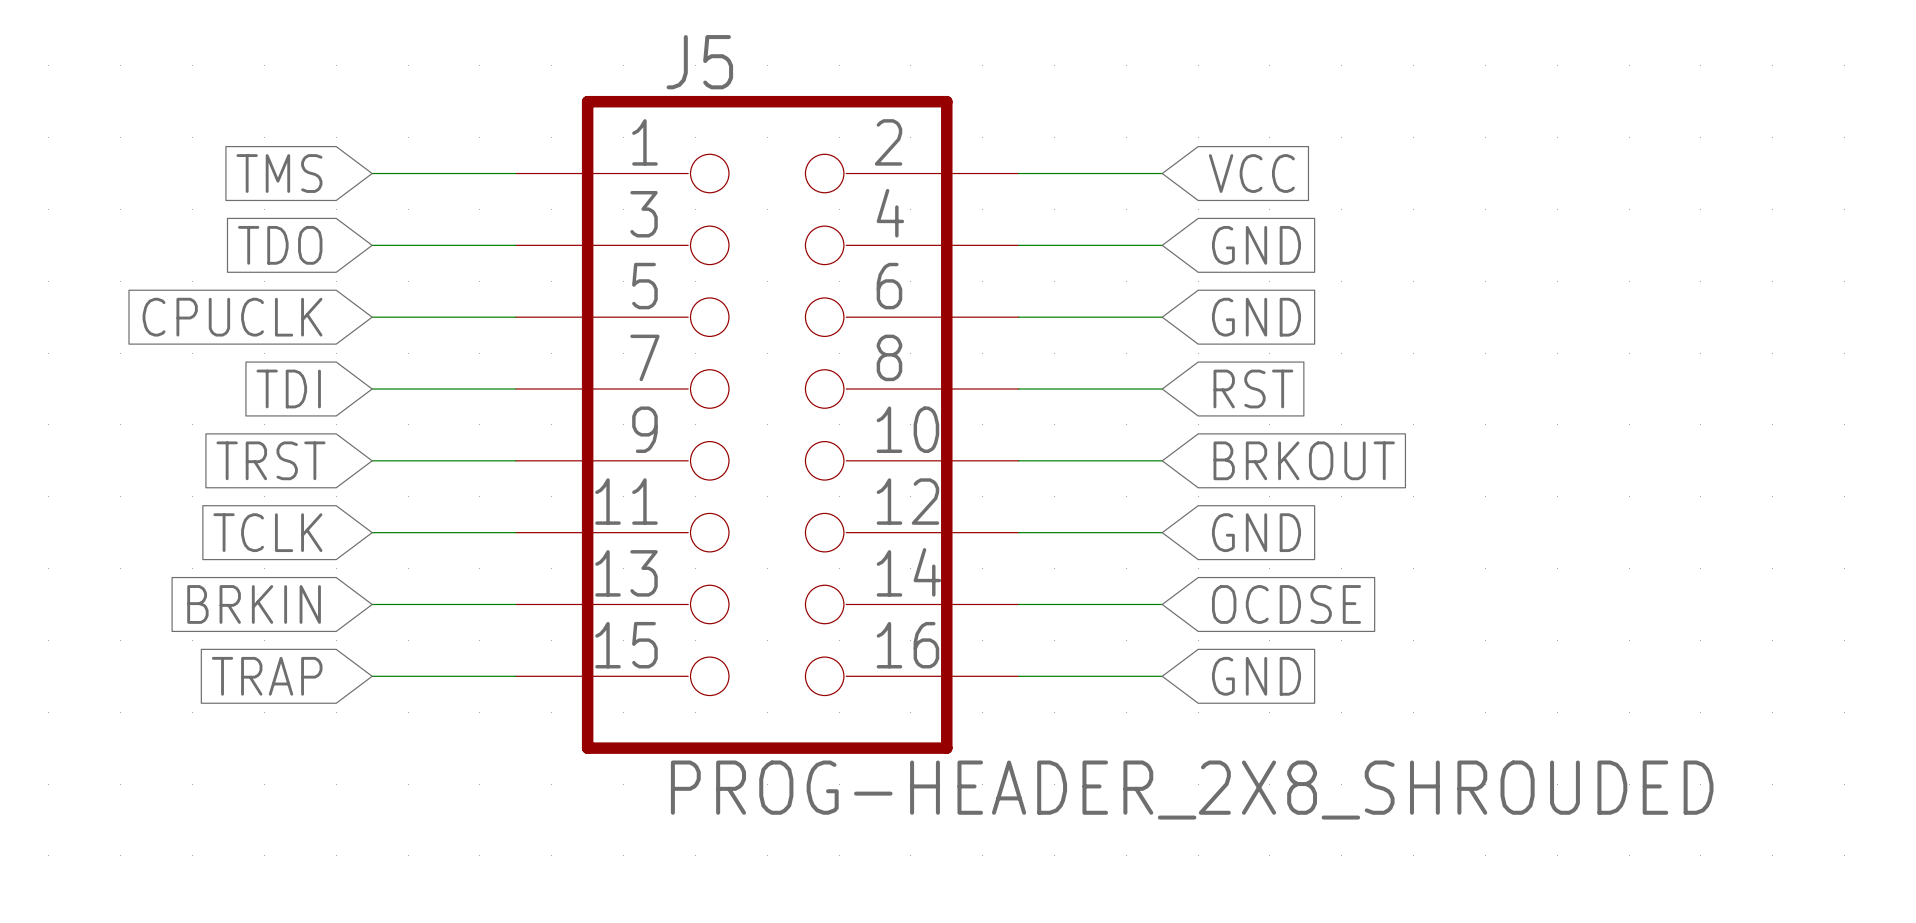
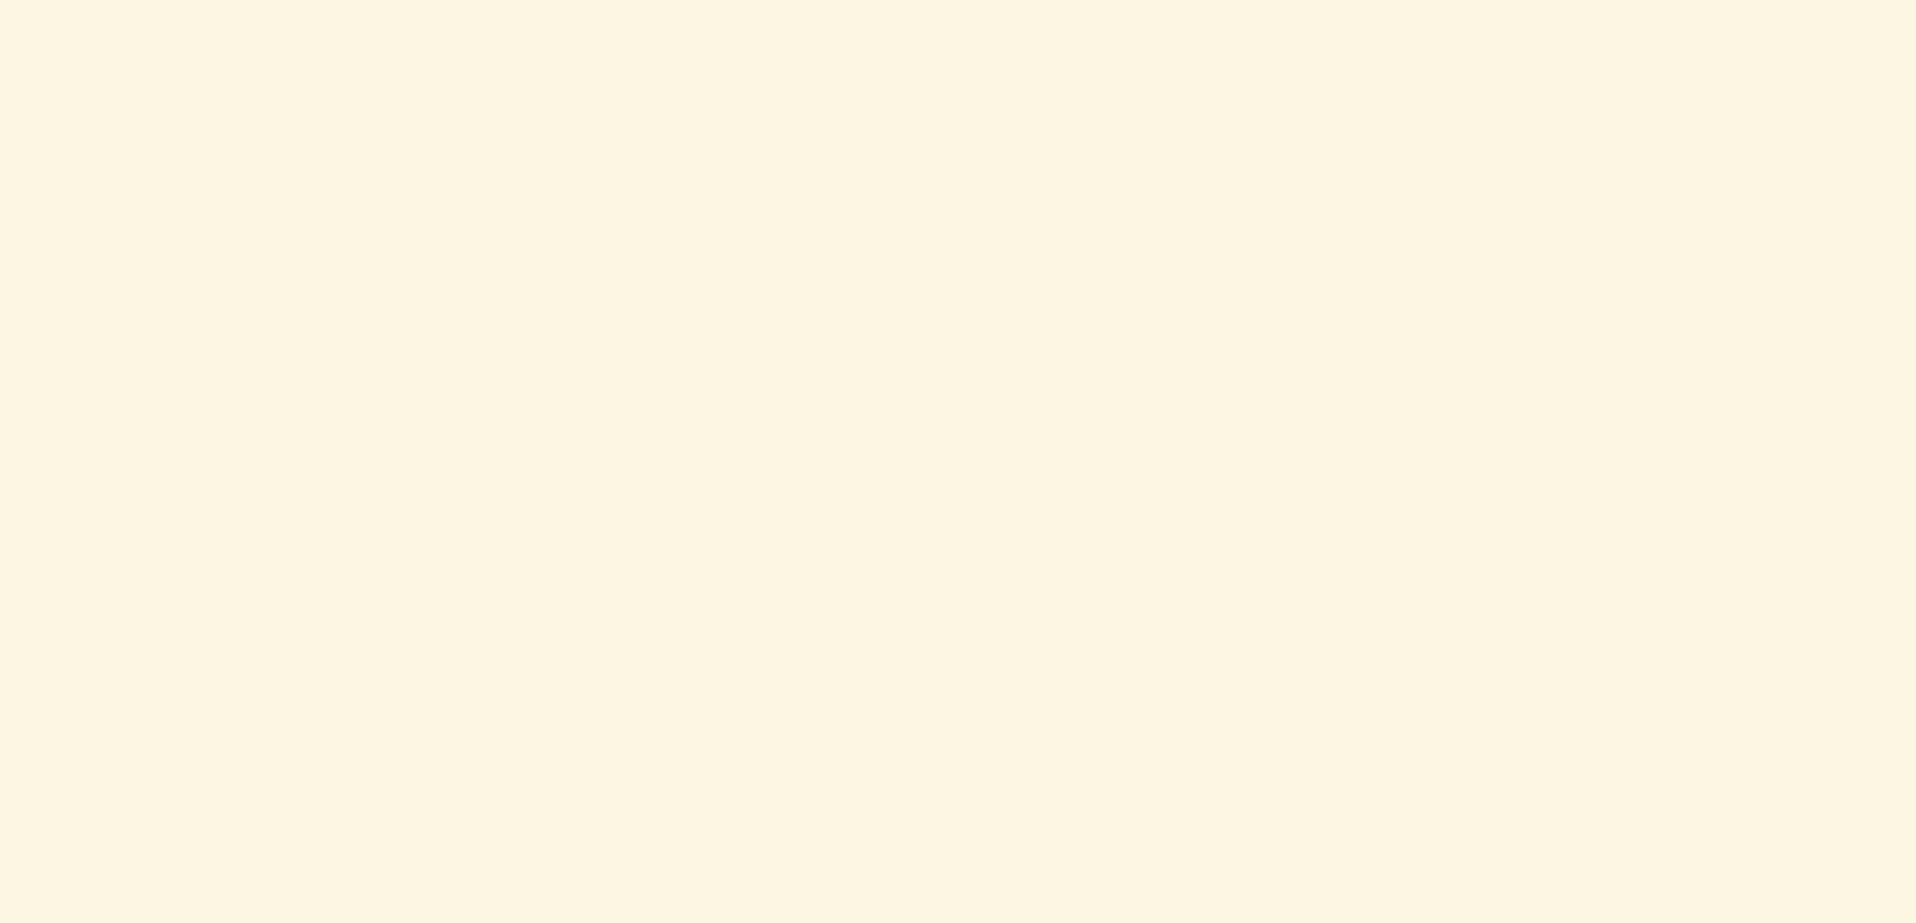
global label: TMS (279, 173) -> none
wire: (372, 173) (515, 173) -> none
wire: (1018, 173) (1162, 173) -> none
global label: VCC (1251, 173) -> none
global label: TDO (280, 245) -> none
wire: (372, 245) (515, 245) -> none
wire: (1018, 245) (1162, 245) -> none
global label: GND (1256, 245) -> none
global label: CPUCLK (232, 317) -> none
wire: (372, 317) (515, 317) -> none
wire: (1018, 317) (1162, 317) -> none
global label: GND (1256, 317) -> none
global label: TDI (288, 389) -> none
wire: (372, 389) (515, 389) -> none
wire: (1018, 389) (1162, 389) -> none
global label: RST (1253, 389) -> none
J5: PROG-HEADER_2X8_SHROUDED (767, 424) -> none
global label: TRST (271, 460) -> none
wire: (372, 460) (515, 460) -> none
wire: (1018, 460) (1162, 460) -> none
global label: BRKOUT (1304, 460) -> none
global label: TCLK (267, 532) -> none
wire: (372, 532) (515, 532) -> none
wire: (1018, 532) (1162, 532) -> none
global label: GND (1256, 532) -> none
global label: BRKIN (254, 604) -> none
wire: (372, 604) (515, 604) -> none
wire: (1018, 604) (1162, 604) -> none
global label: OCDSE (1286, 604) -> none
global label: TRAP (267, 676) -> none
wire: (372, 676) (515, 676) -> none
wire: (1018, 676) (1162, 676) -> none
global label: GND (1256, 676) -> none

